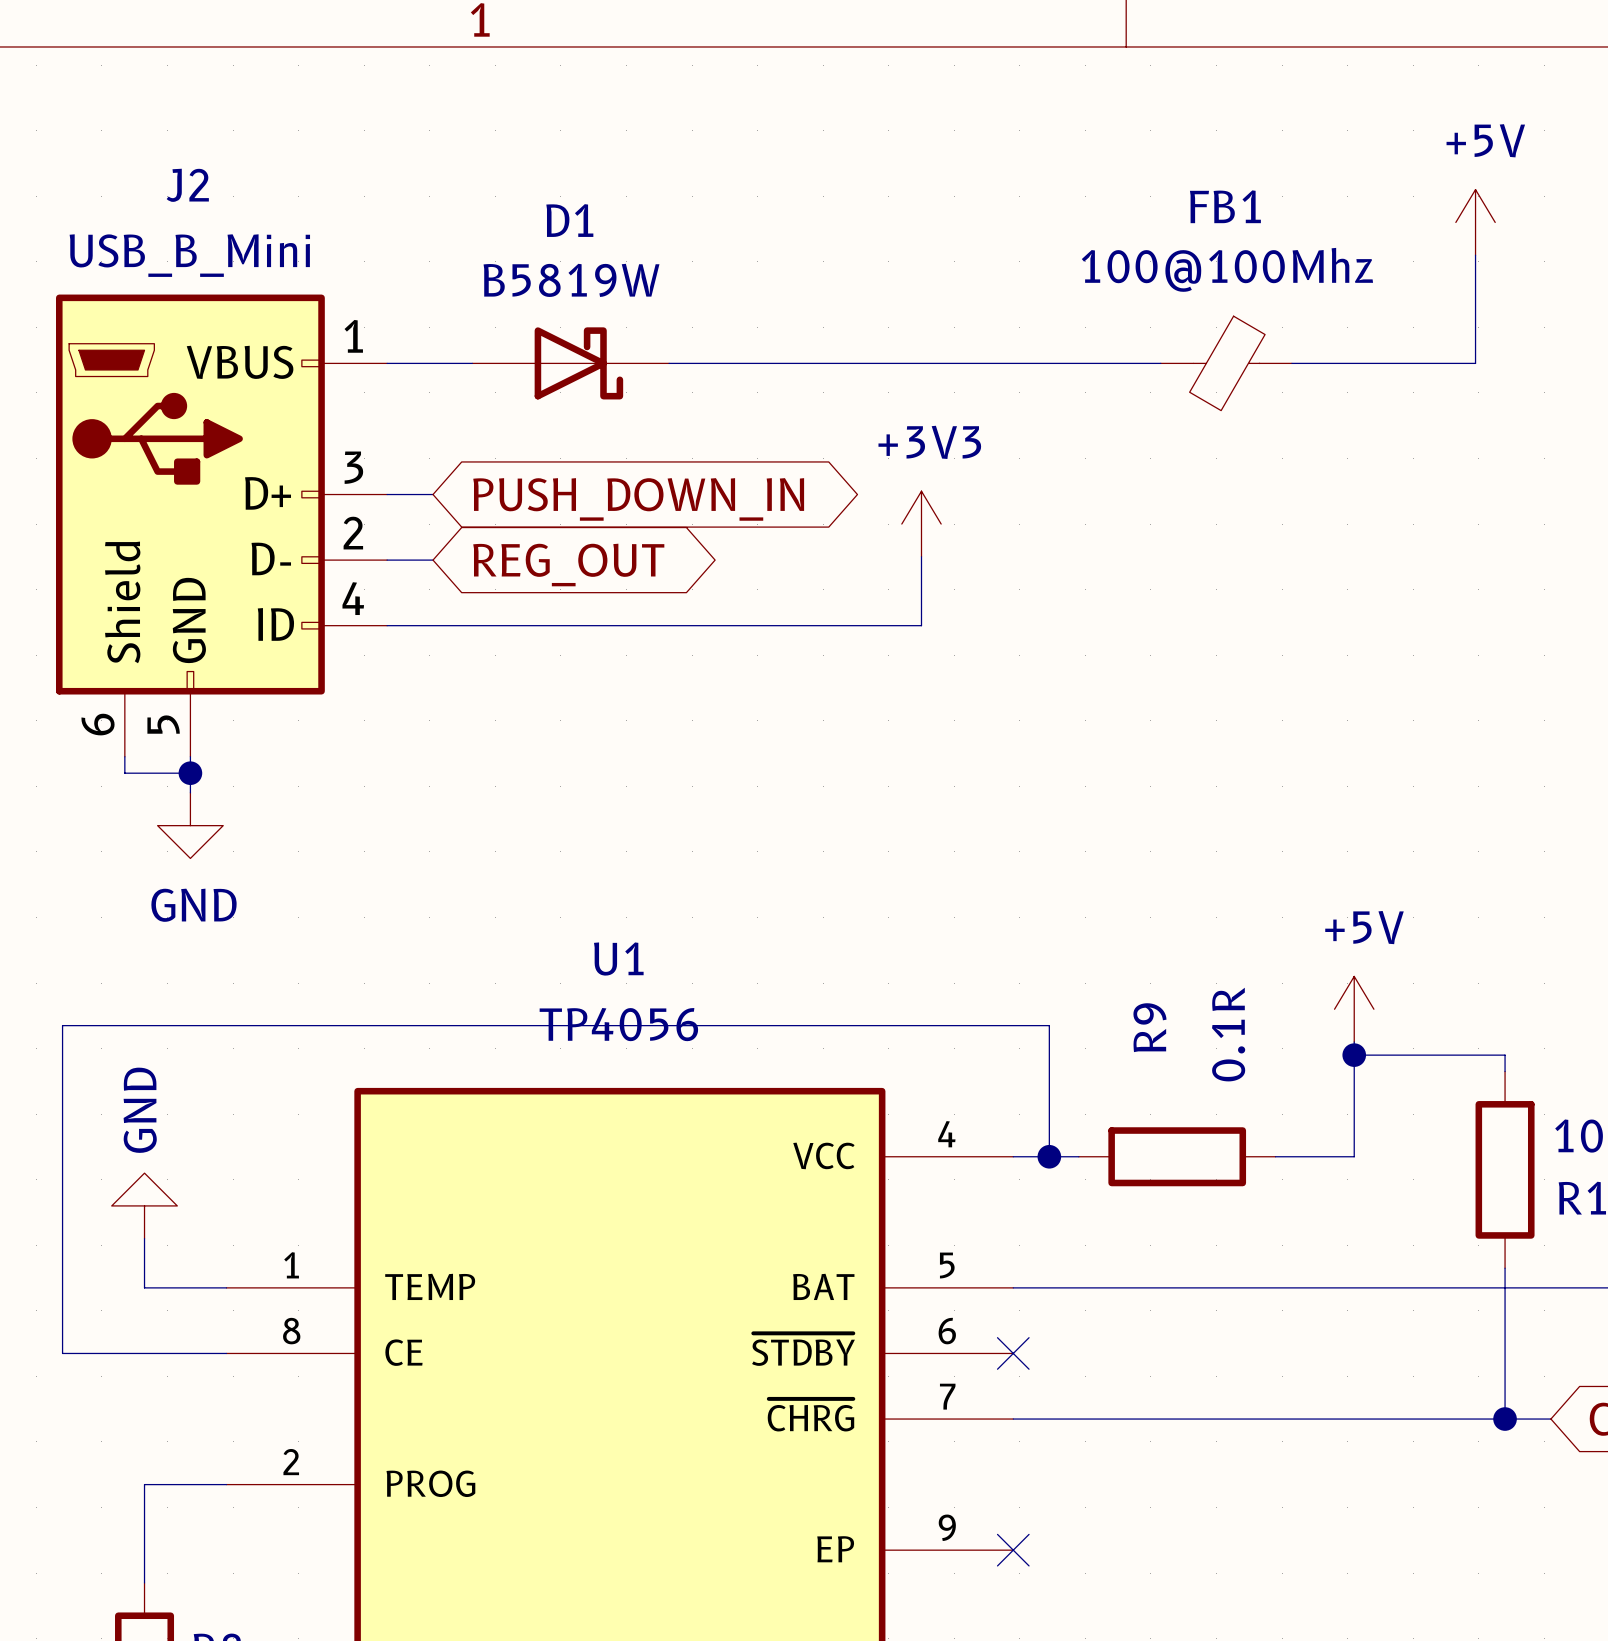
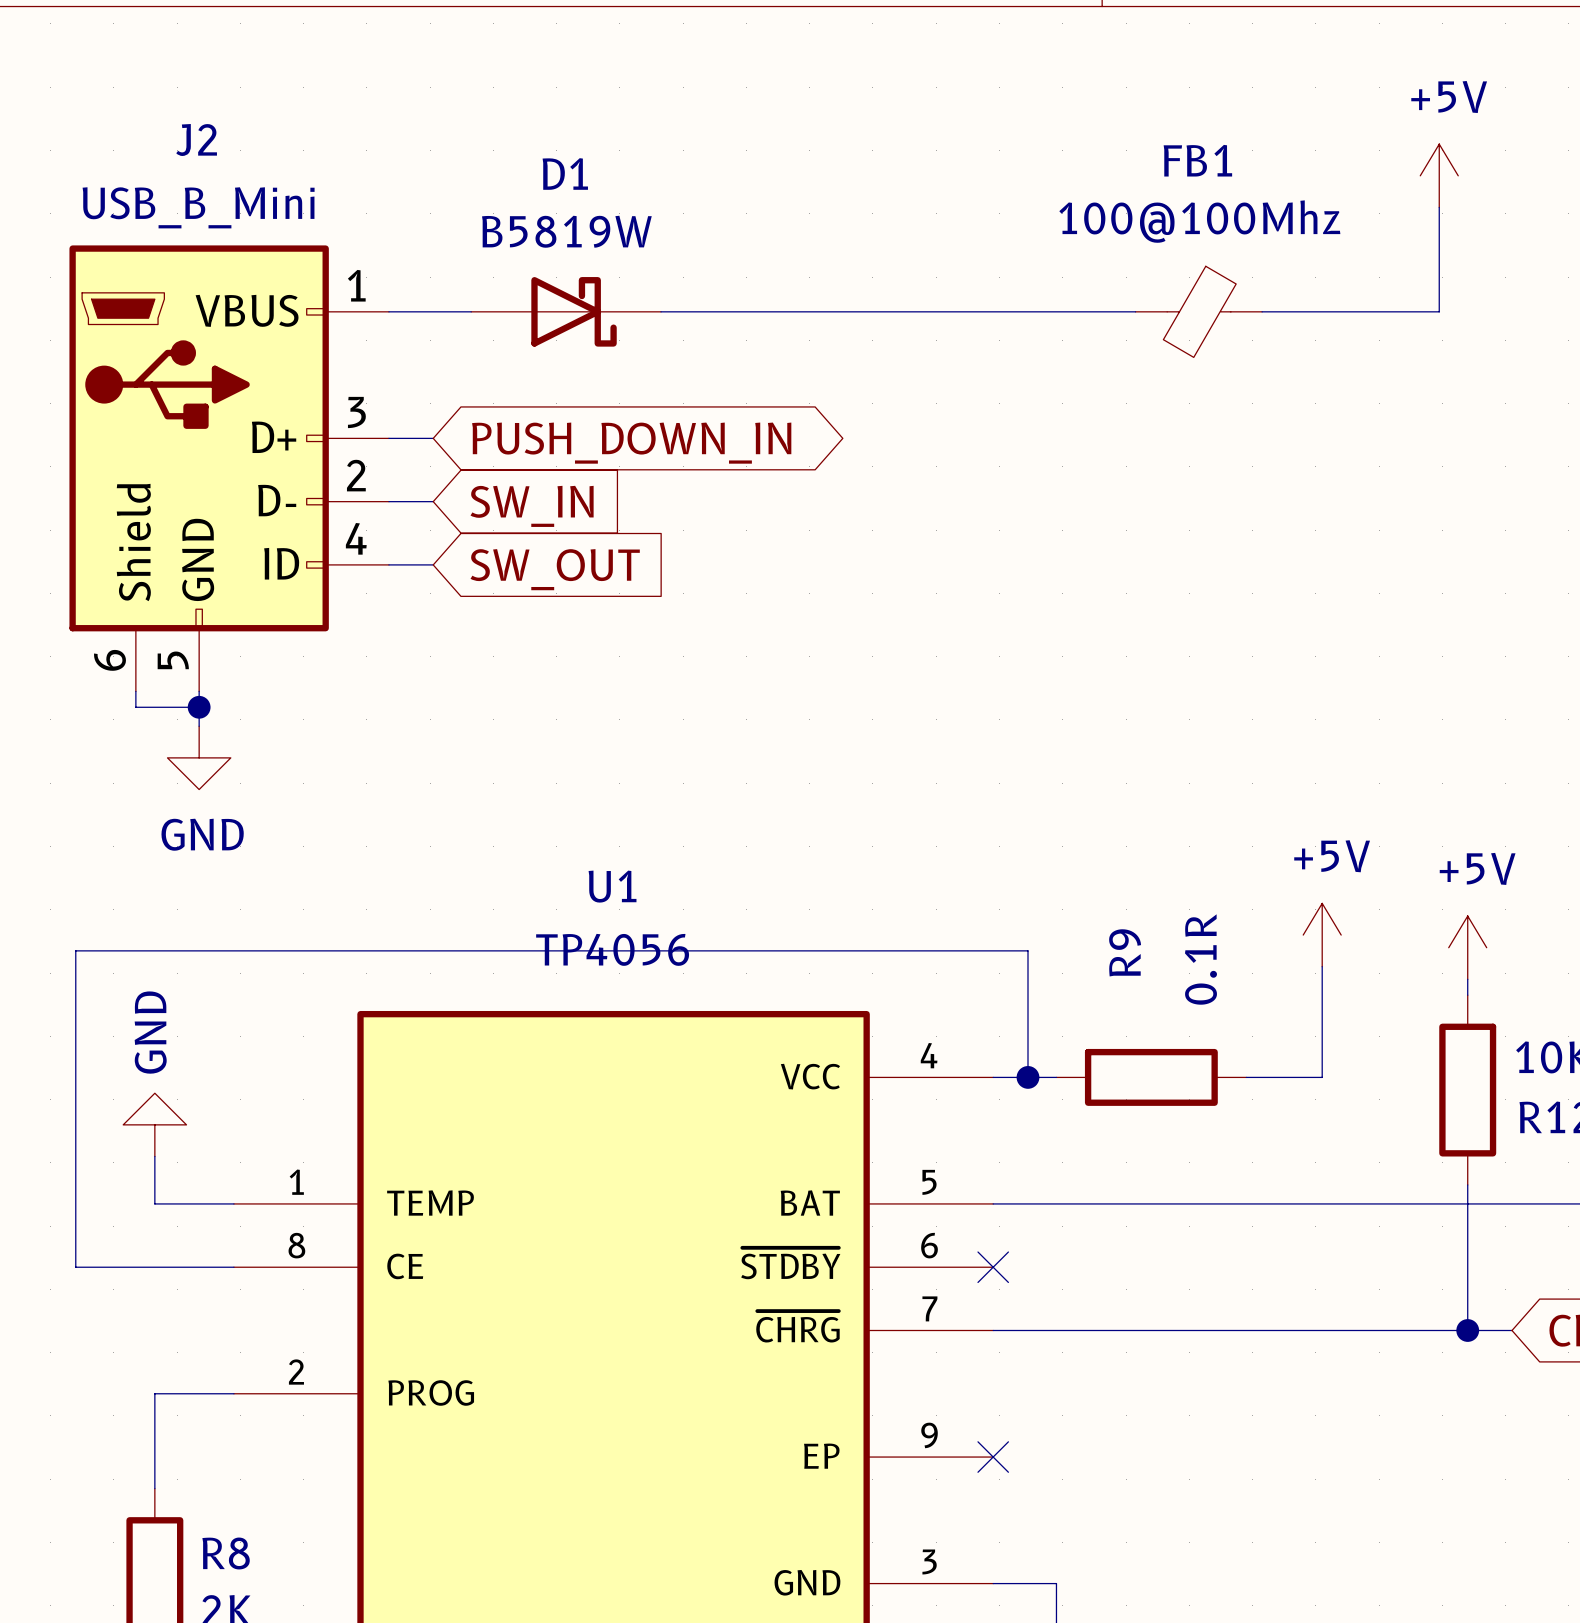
power symbol: +3V3 (921, 524) -> none
wire: (921, 556) (921, 625) (433, 625) -> none
global label shape: bidirectional (568, 565) -> input (532, 506)
global label: REG_OUT (568, 565) -> SW_IN (532, 506)
global label: none -> SW_OUT (555, 569)
power symbol: none -> +5V (1467, 947)
wire: (1354, 1055) (1505, 1055) -> none
junction: (1354, 1055) -> none

